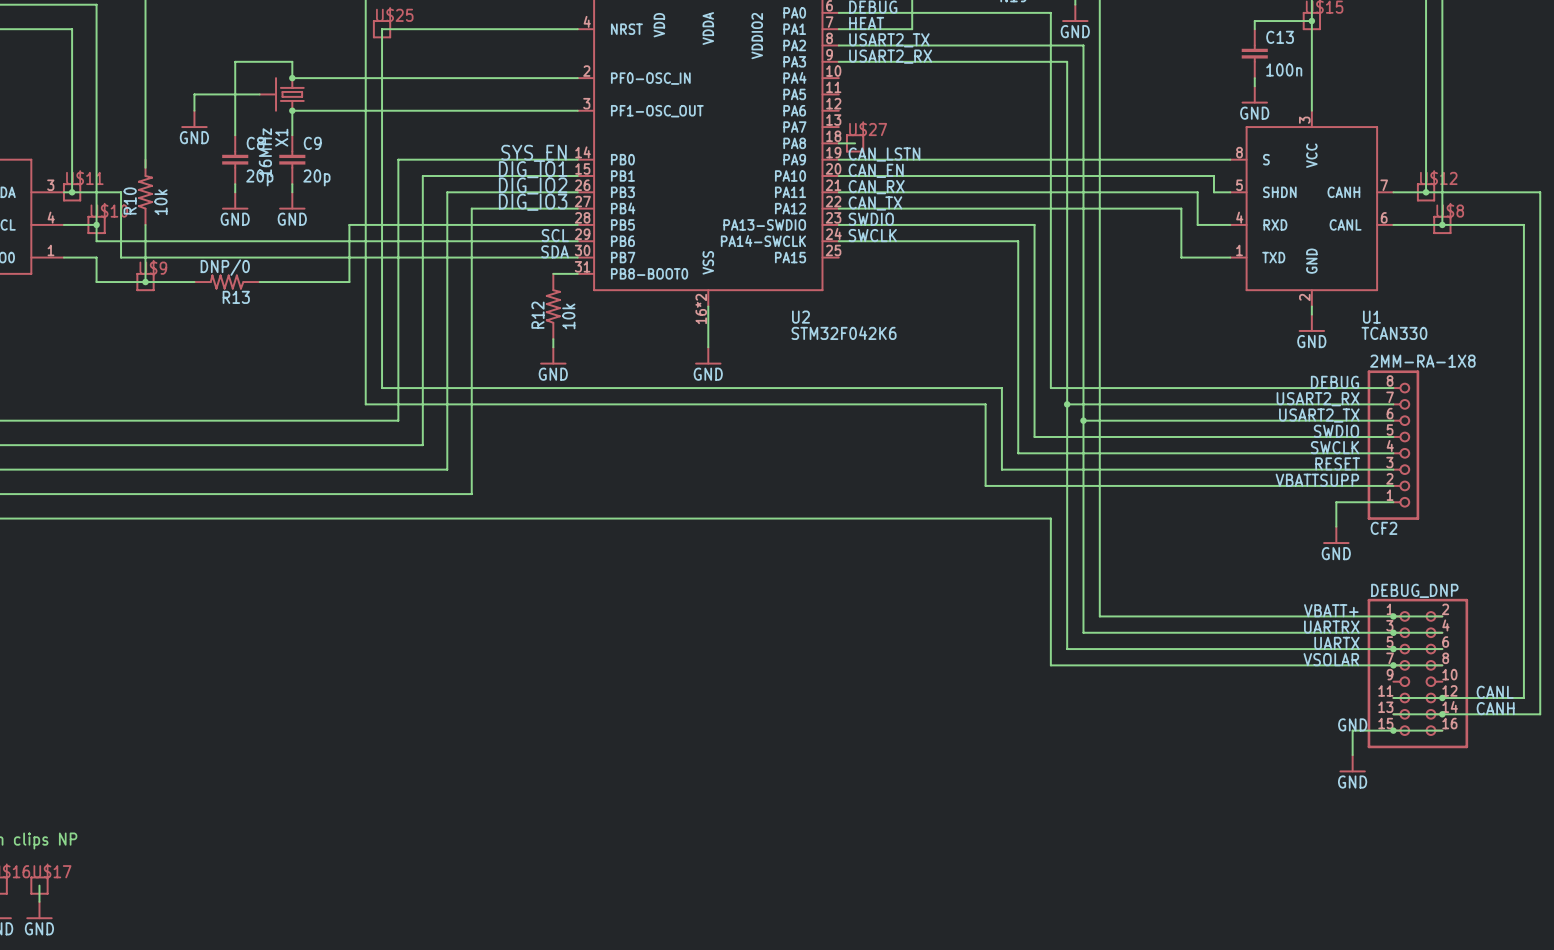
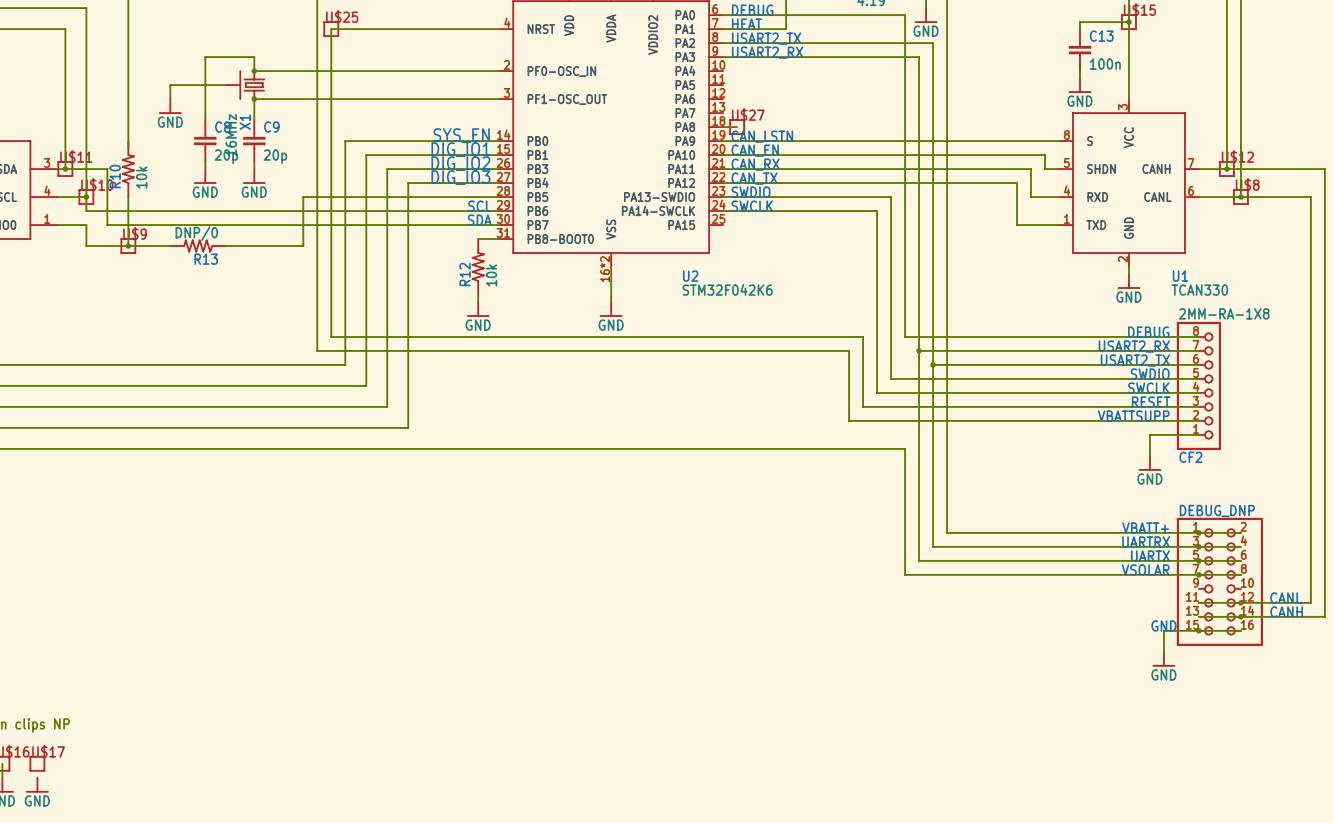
wire: (39, 885) (39, 901) -> none

